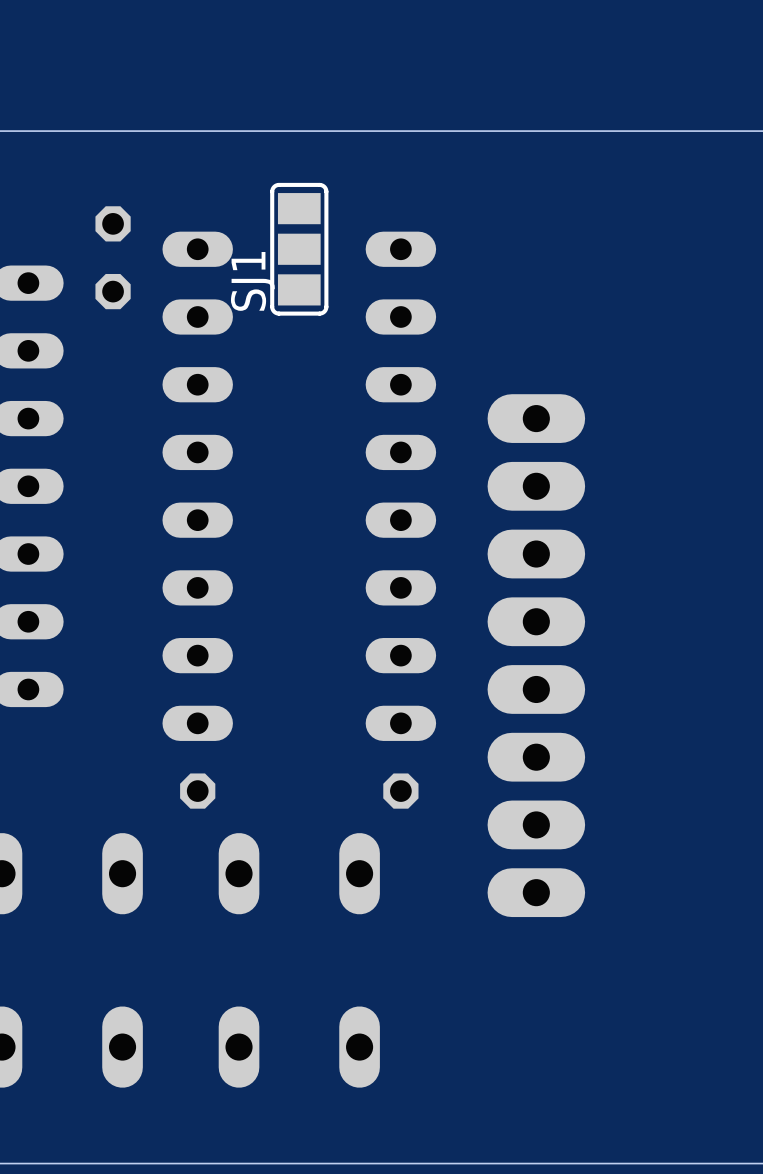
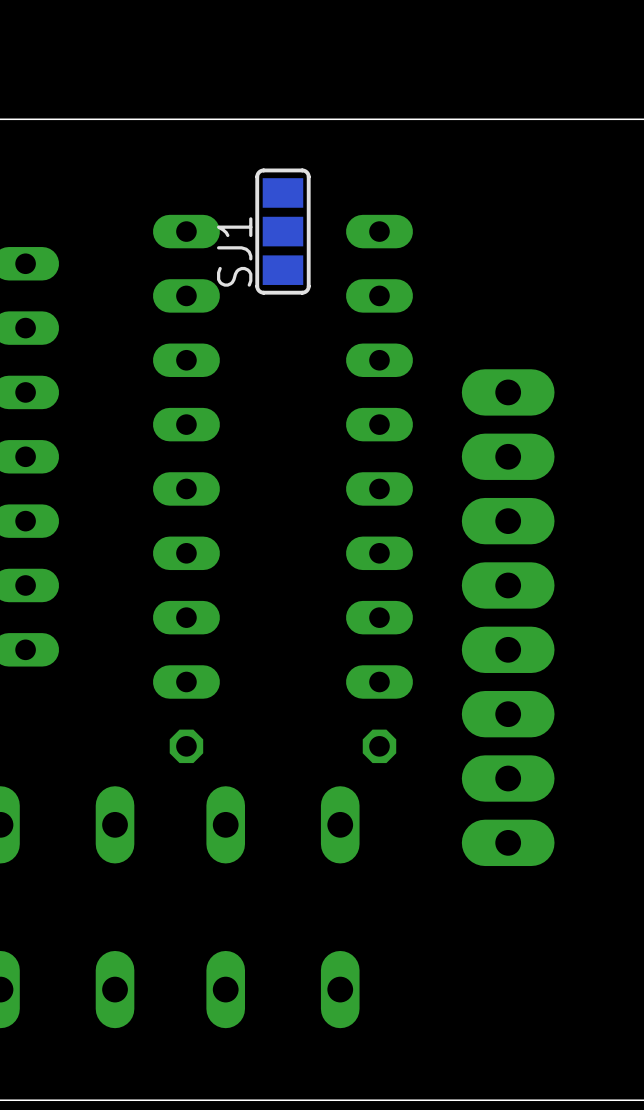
part: (113, 257) -> none

